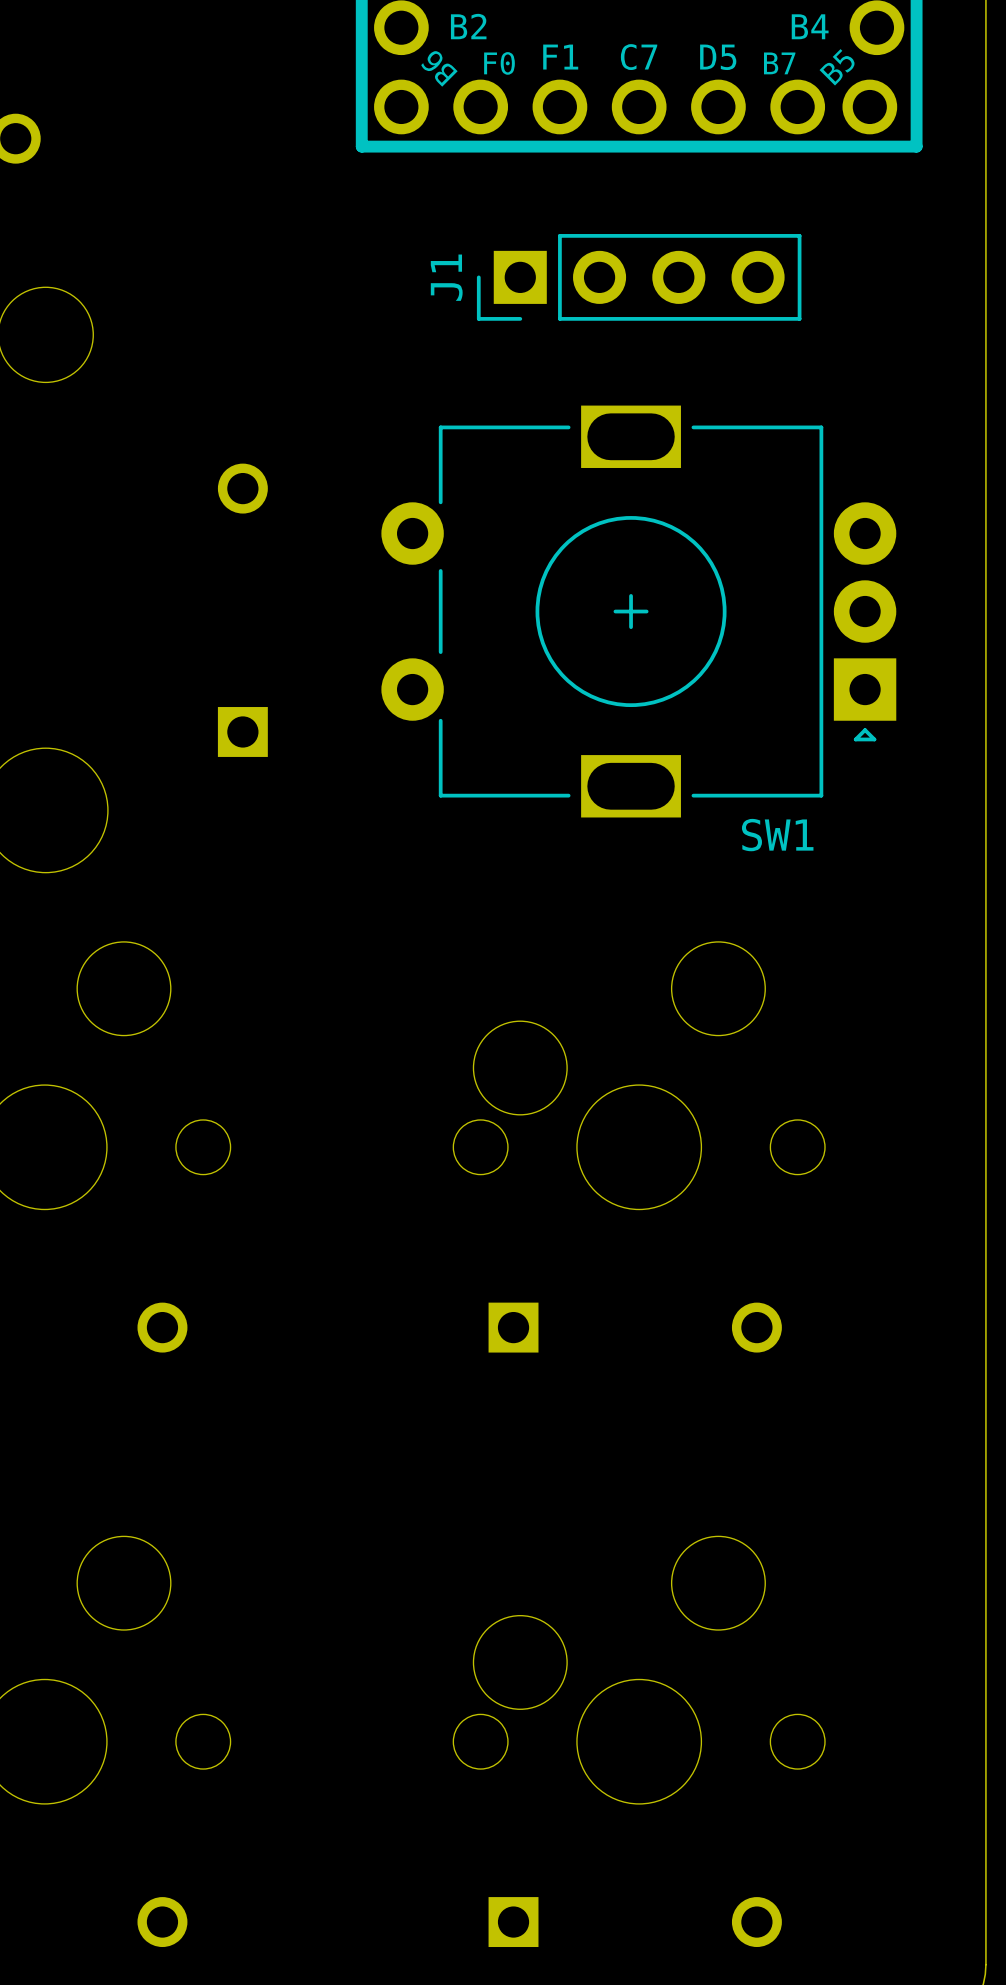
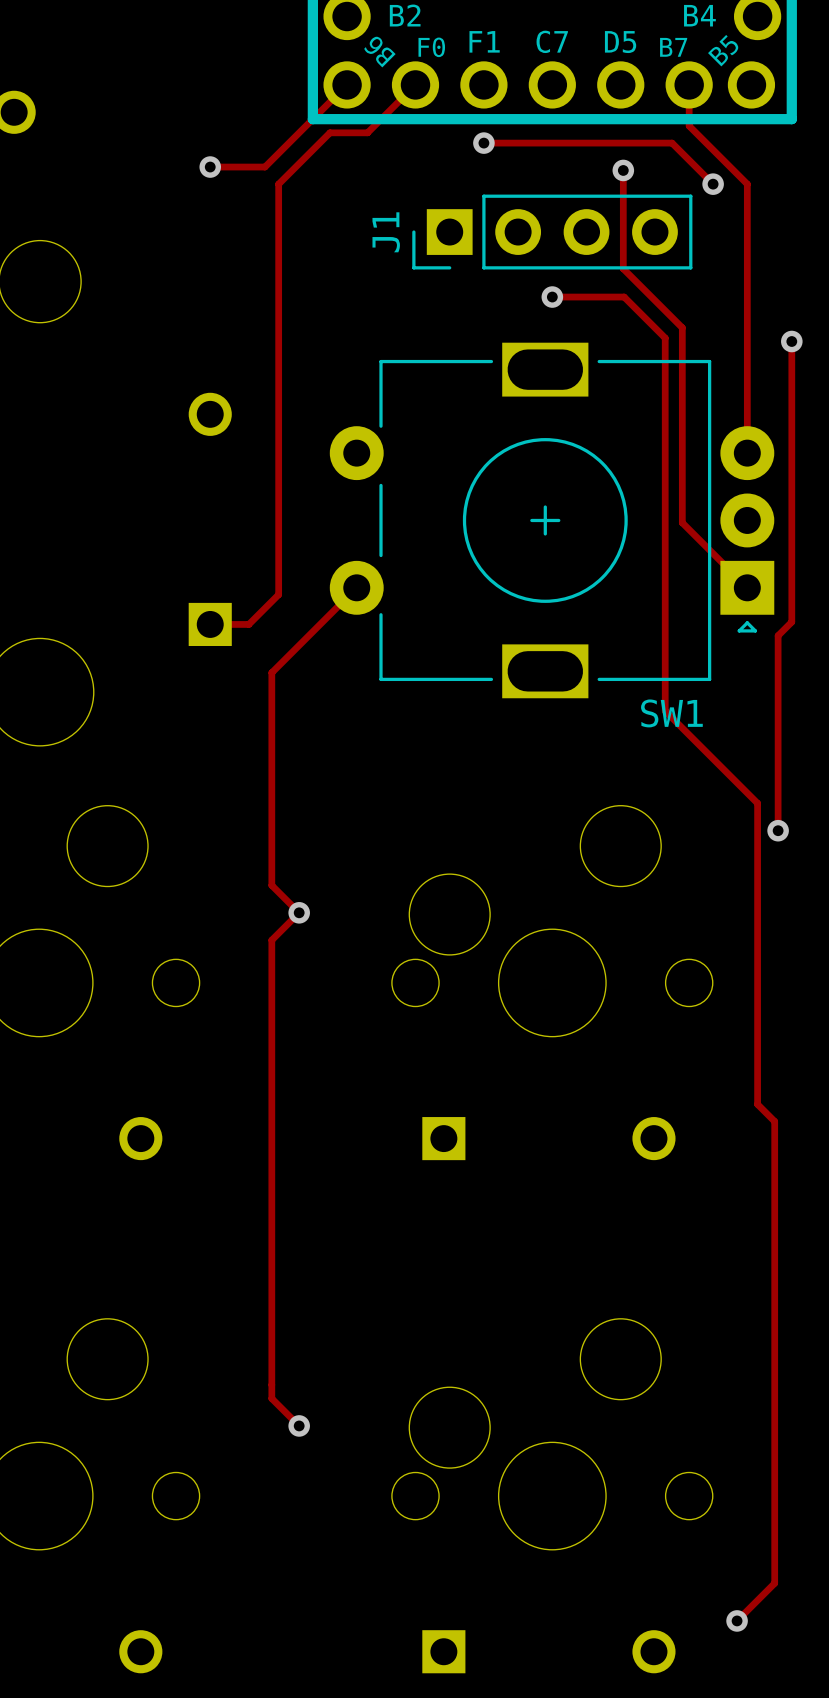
track: none -> (347, 84) (264, 167) (210, 167)
track: none -> (415, 84) (367, 132) (329, 132) (278, 184) (278, 594) (248, 624) (210, 624)
track: none -> (689, 84) (689, 125) (747, 184) (747, 453)
track: none -> (483, 143) (672, 143) (713, 184)
via: none -> (483, 143)
via: none -> (210, 167)
track: none -> (623, 170) (623, 268) (682, 327) (682, 522) (747, 587)
via: none -> (623, 170)
via: none -> (713, 184)
track: none -> (552, 297) (624, 297) (665, 338) (665, 710) (757, 803) (757, 1104) (774, 1121) (774, 1583) (737, 1620)
via: none -> (552, 297)
track: none -> (791, 341) (791, 622) (778, 635) (778, 830)
via: none -> (791, 341)
track: none -> (356, 587) (271, 672) (271, 885) (299, 912) (271, 940) (271, 1398) (299, 1425)
via: none -> (778, 830)
via: none -> (299, 912)
via: none -> (299, 1425)
via: none -> (737, 1620)

